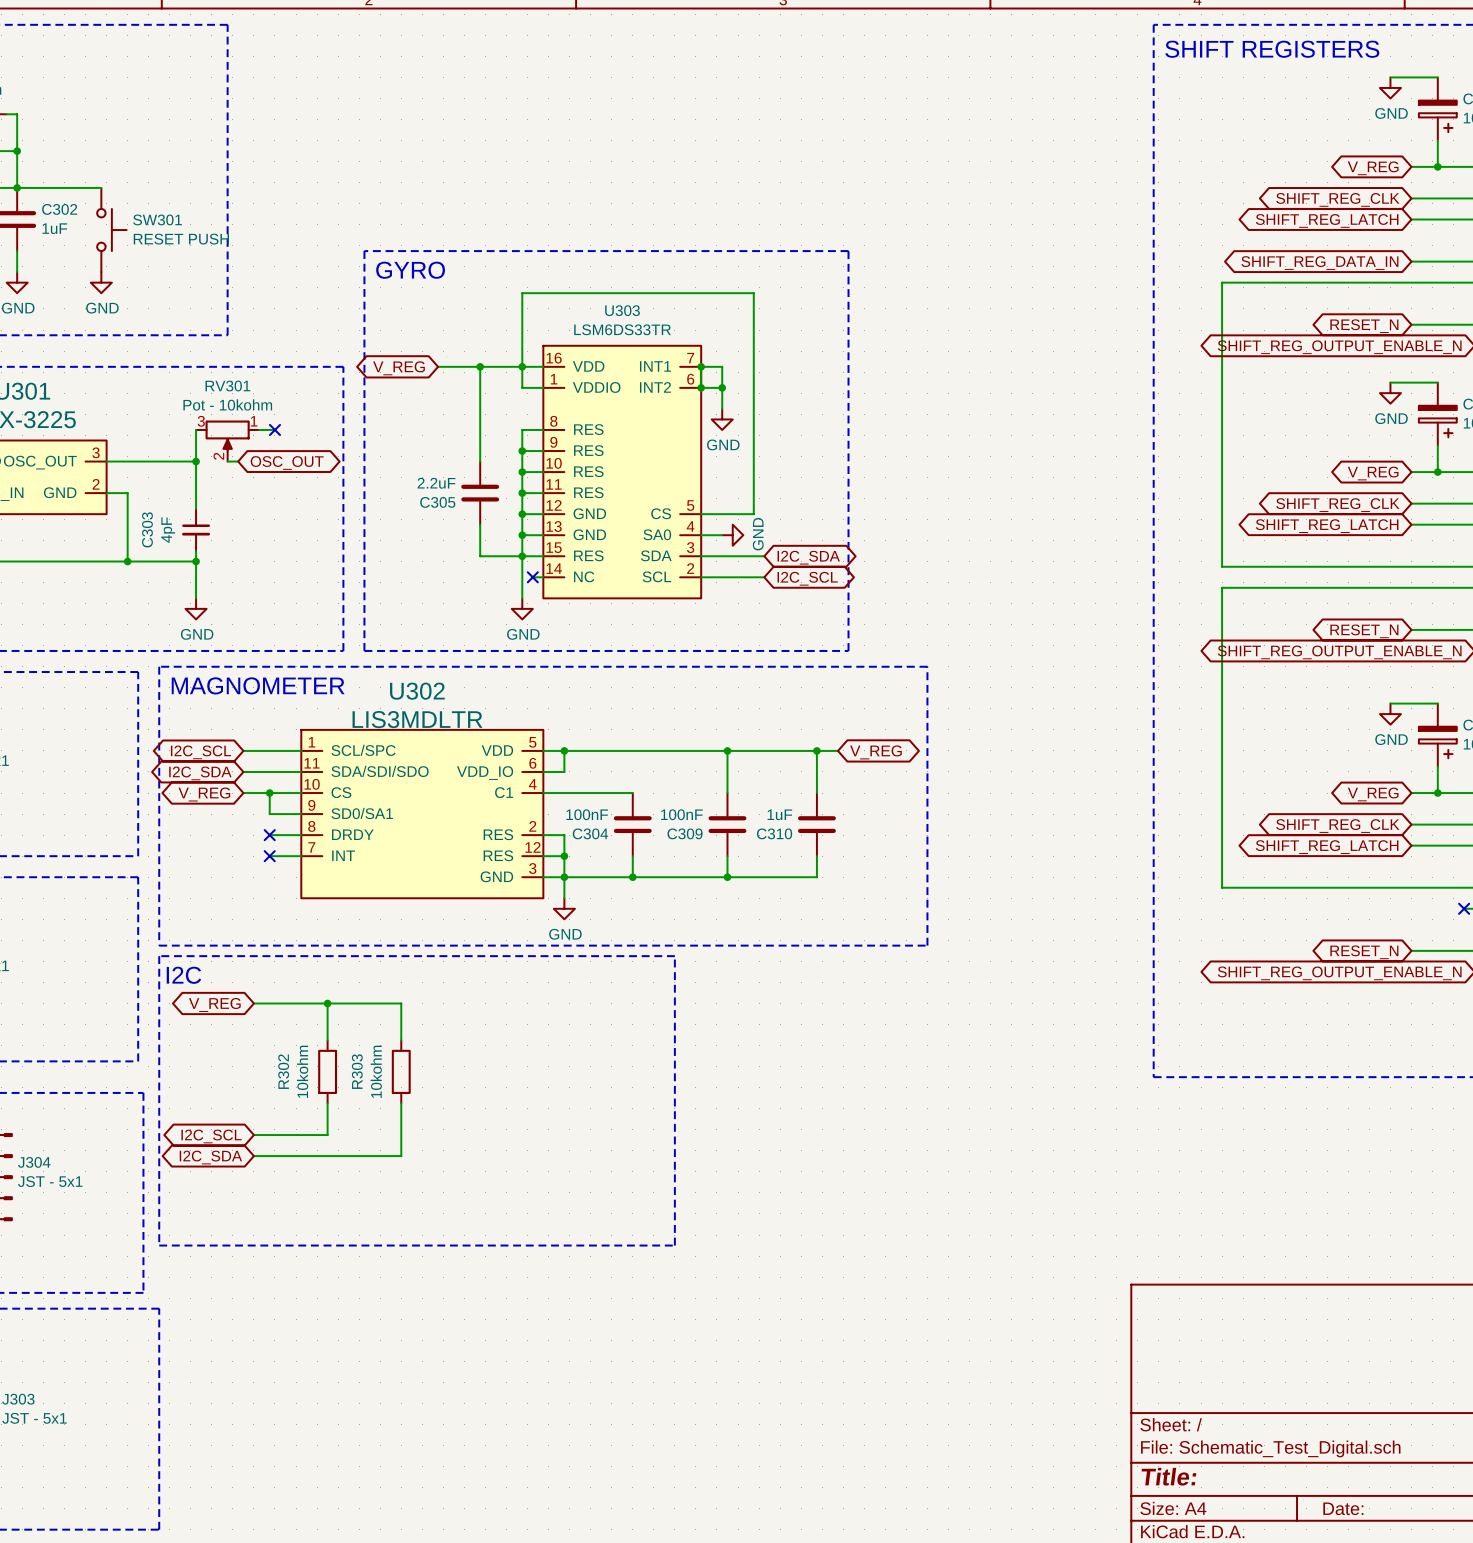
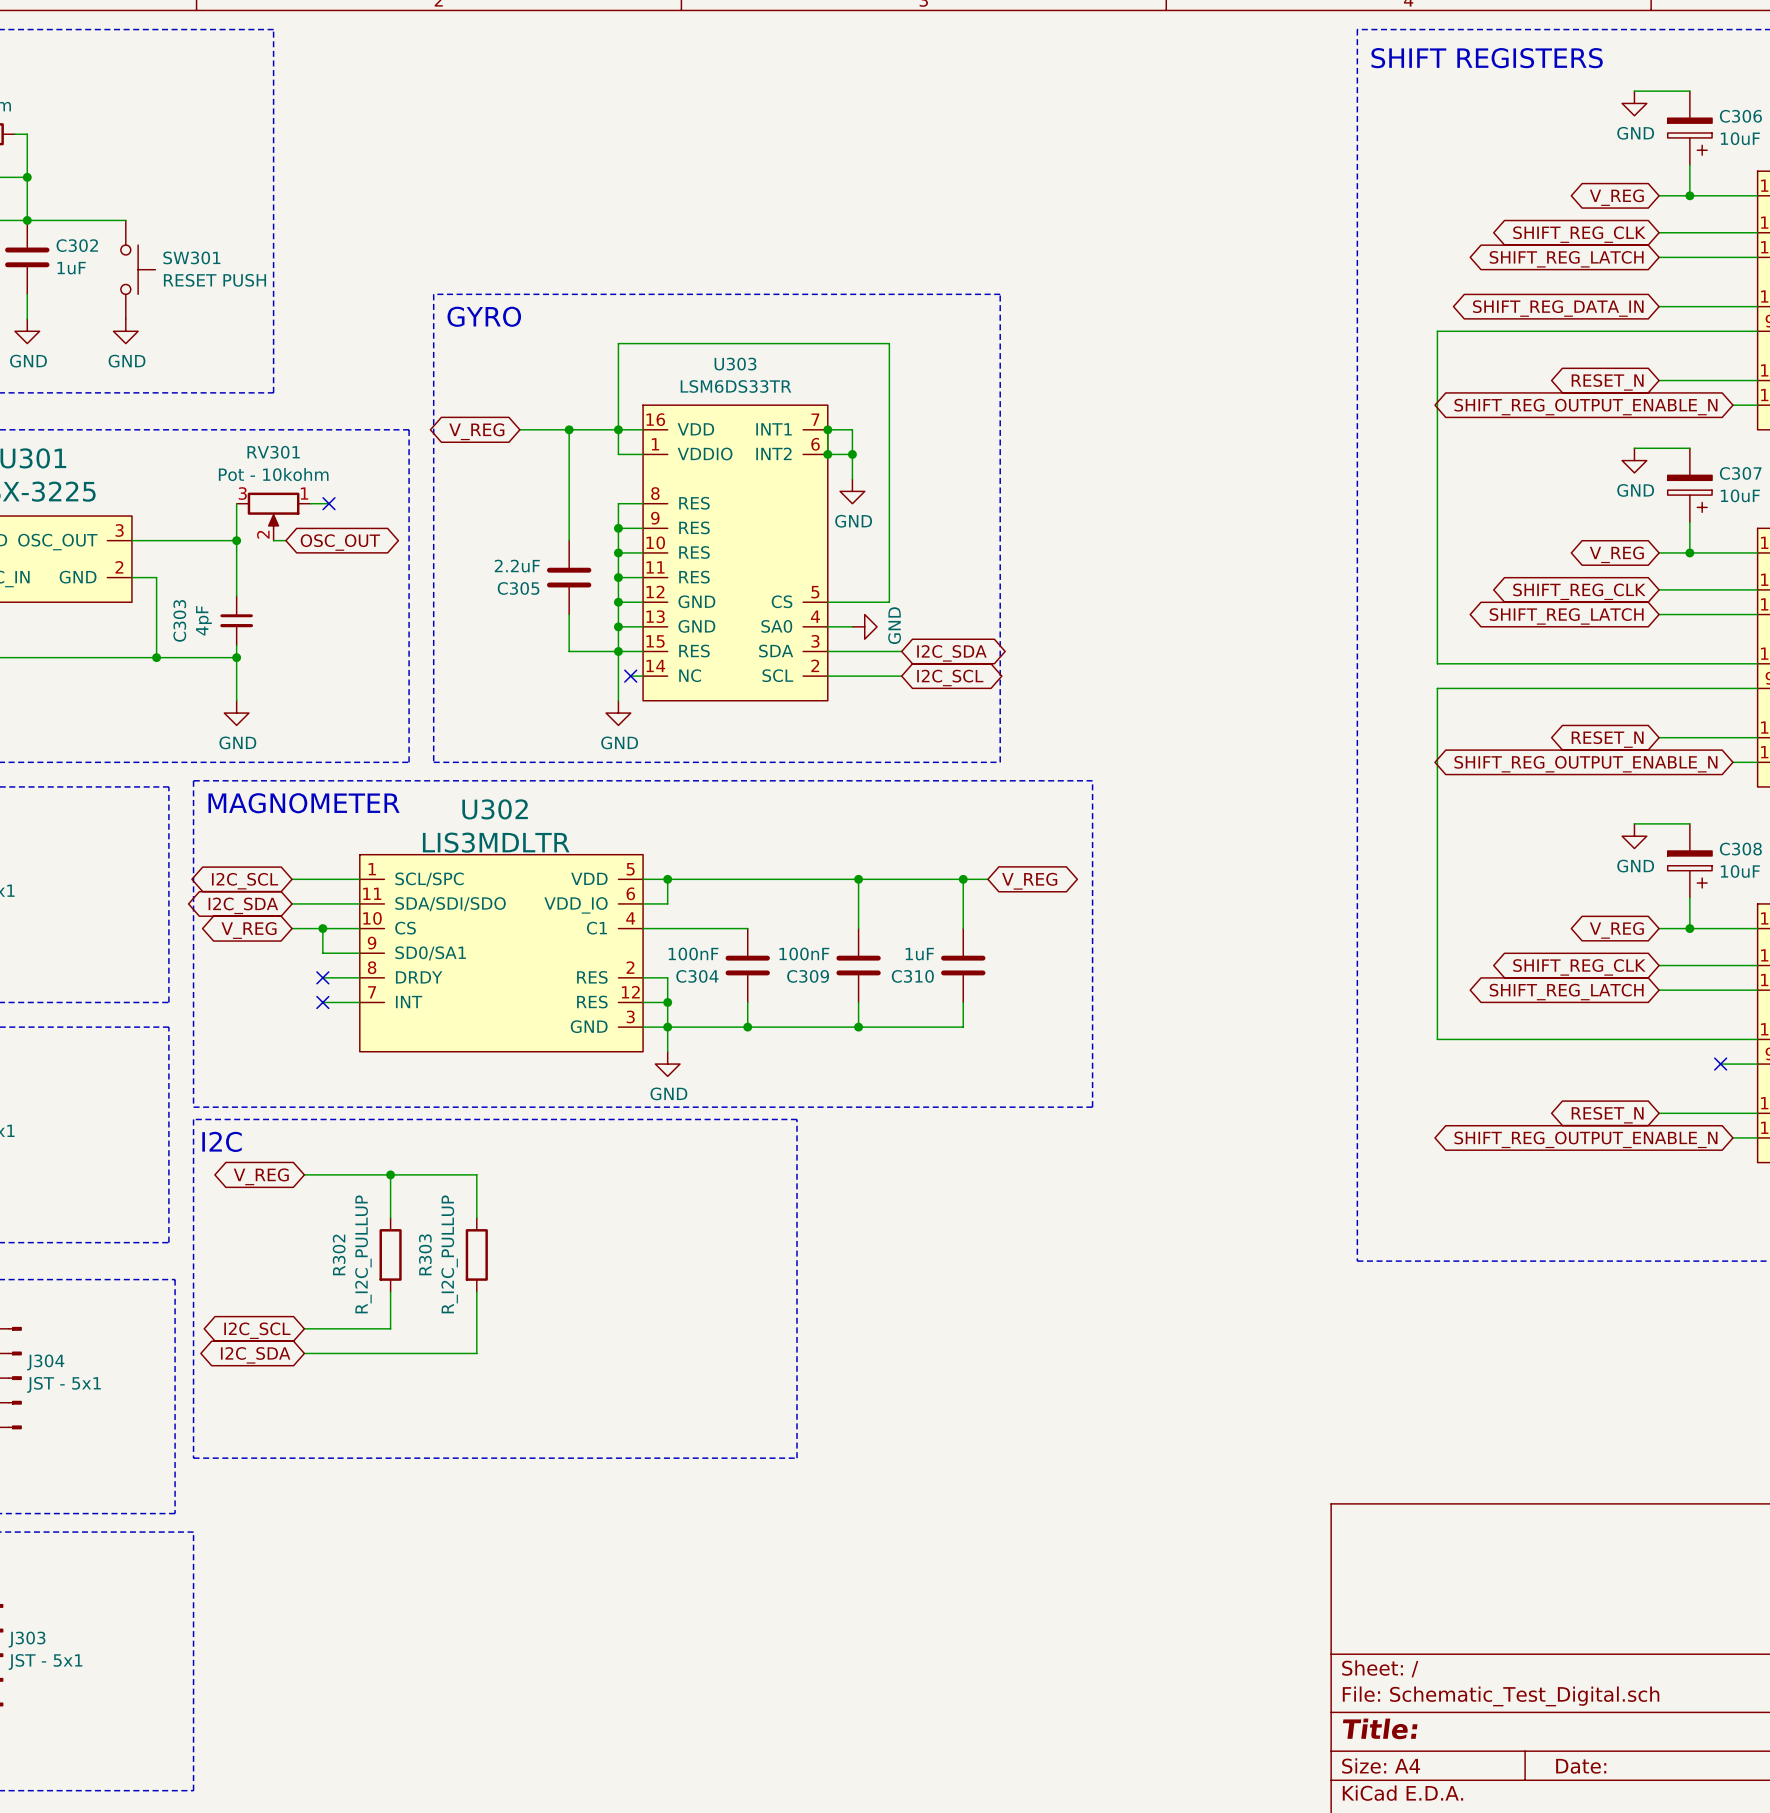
R302 value: 10kohm (302, 1071) -> R_I2C_PULLUP (363, 1254)
R303 value: 10kohm (376, 1071) -> R_I2C_PULLUP (449, 1254)

